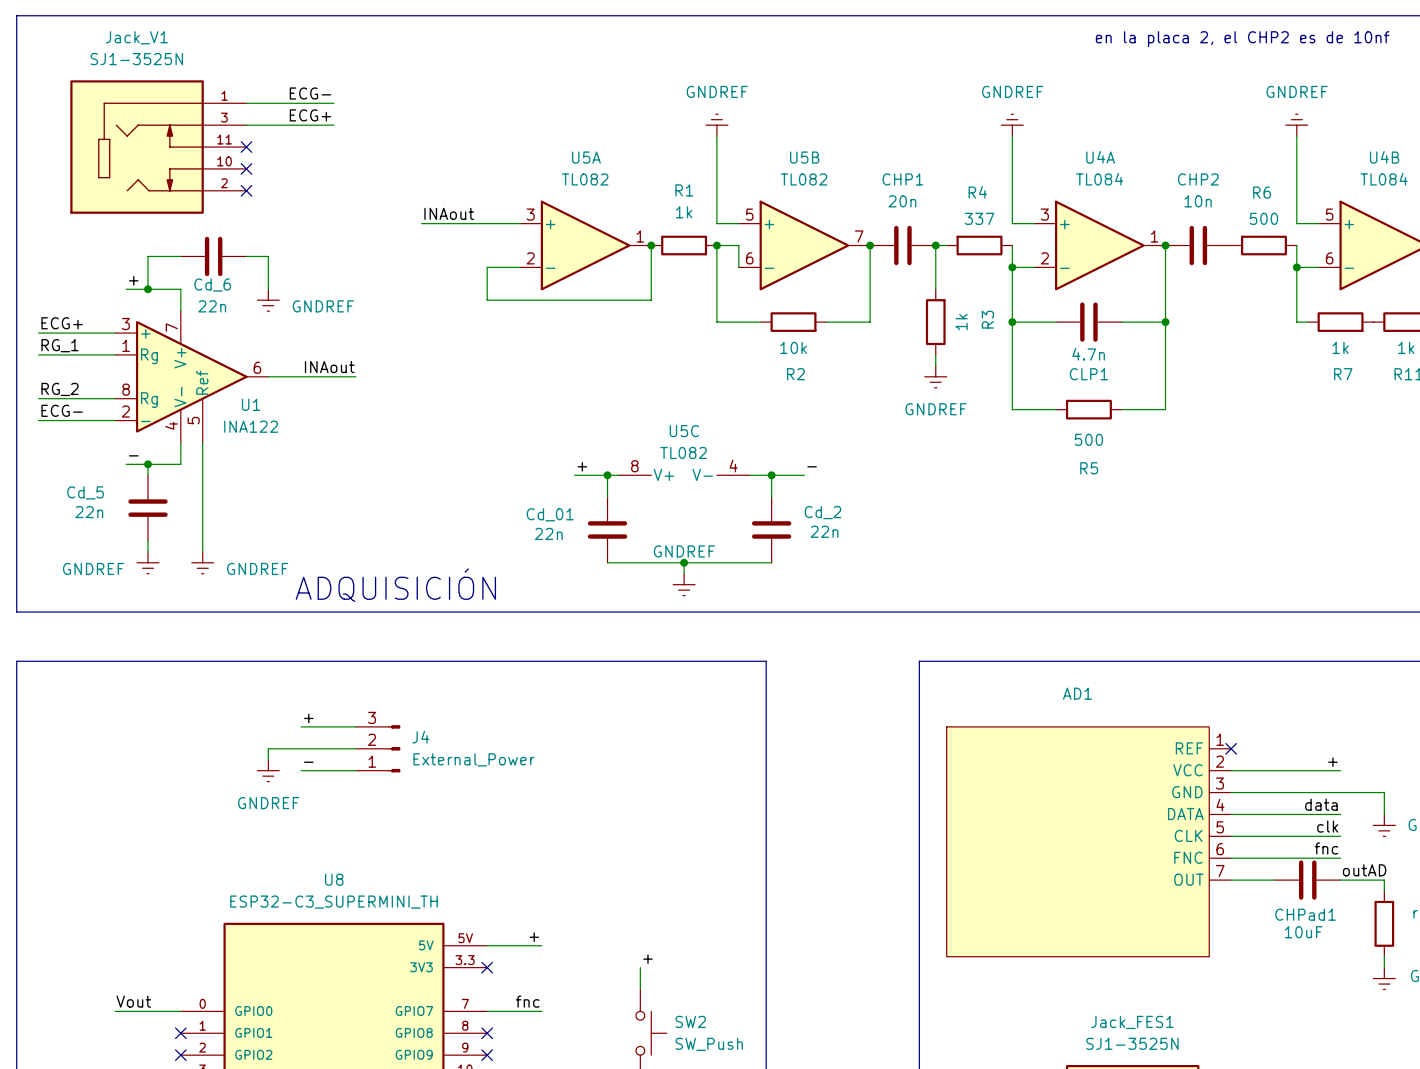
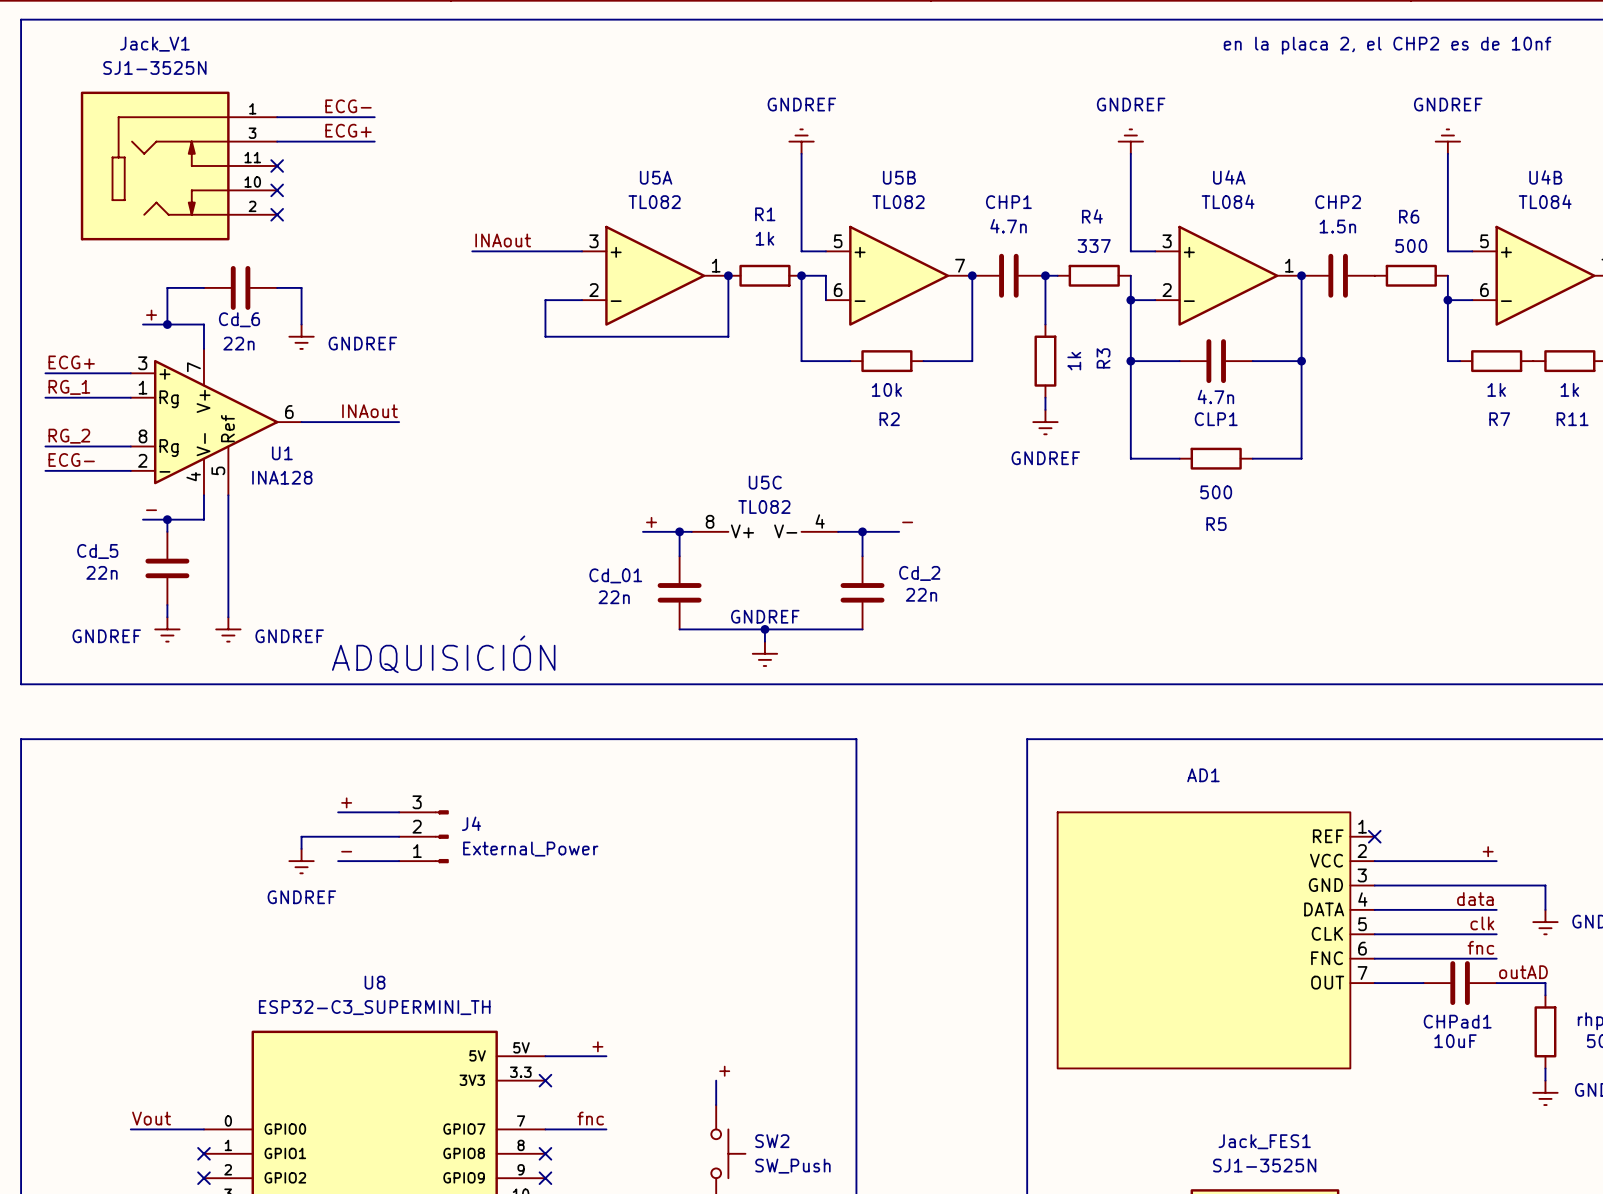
CHP1 value: 20n (902, 201) -> 4.7n (1008, 226)
CHP2 value: 10n (1198, 201) -> 1.5n (1337, 226)
U1 value: INA122 (251, 426) -> INA128 (282, 477)

